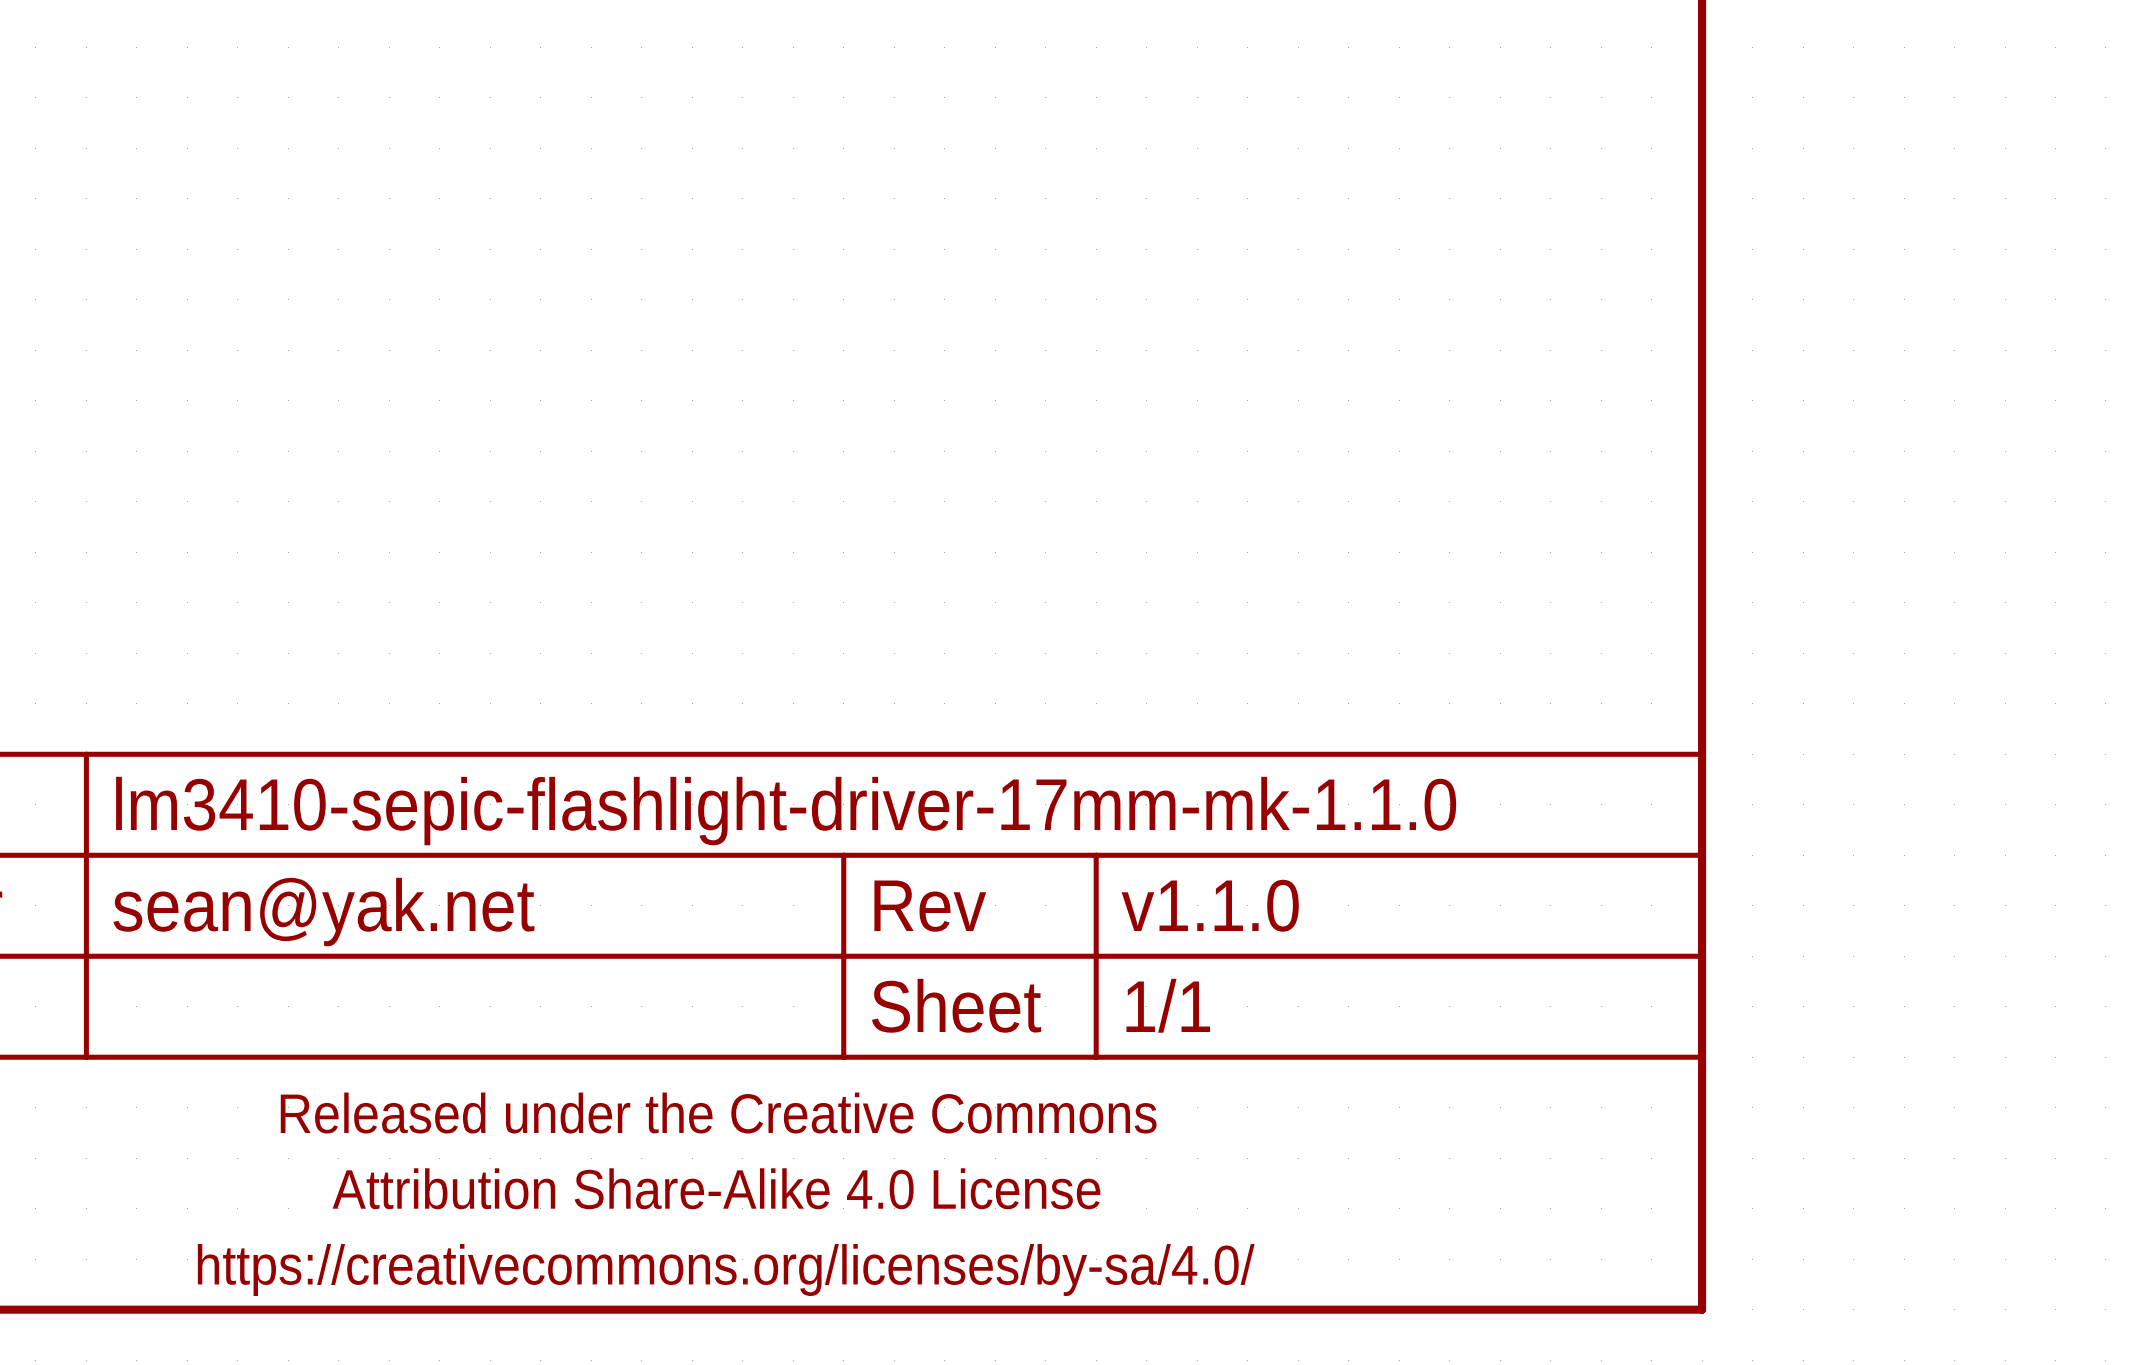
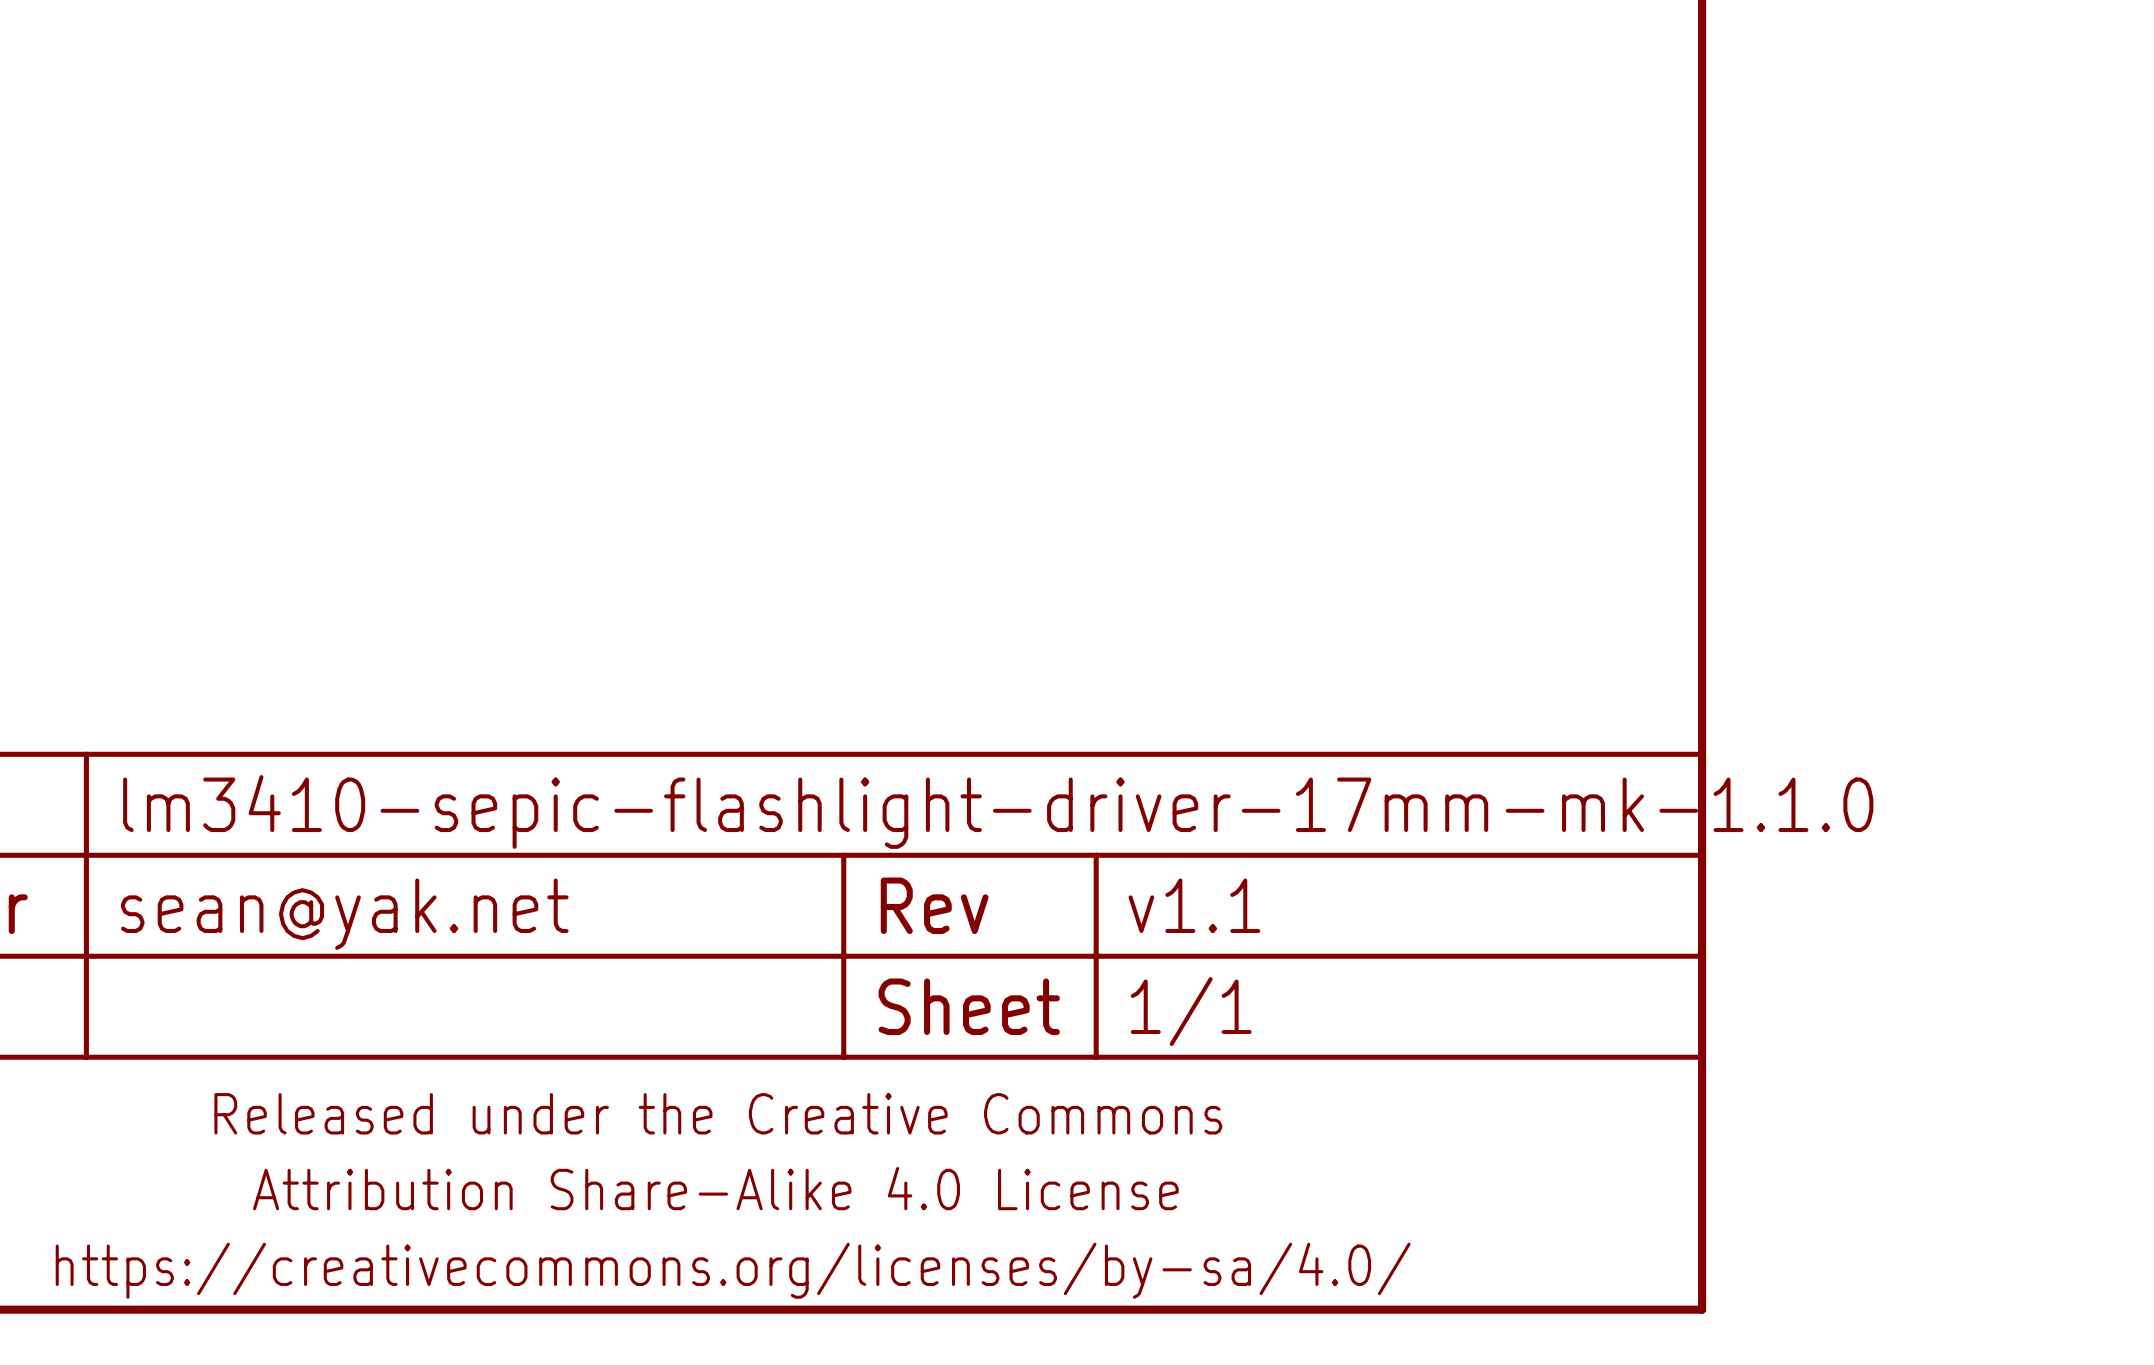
part text: v1.1.0 (1210, 905) -> v1.1 (1194, 905)

